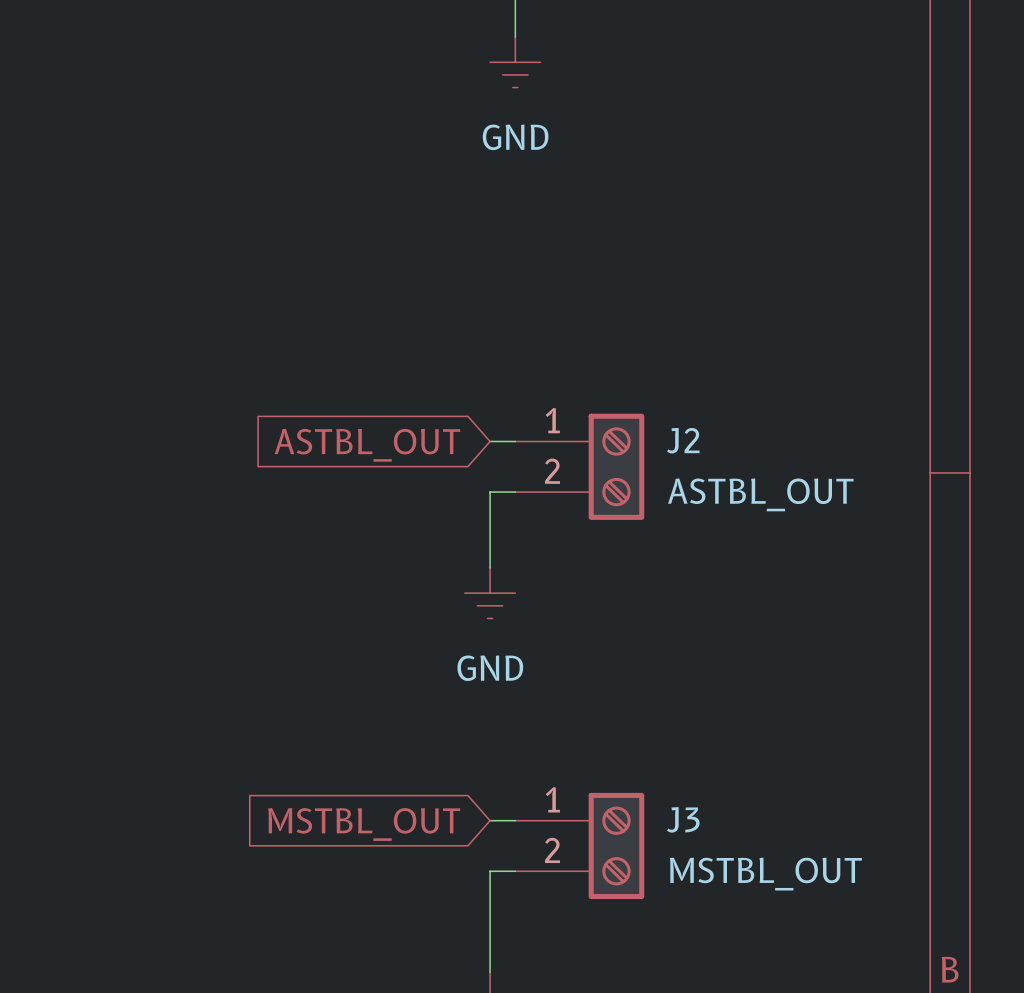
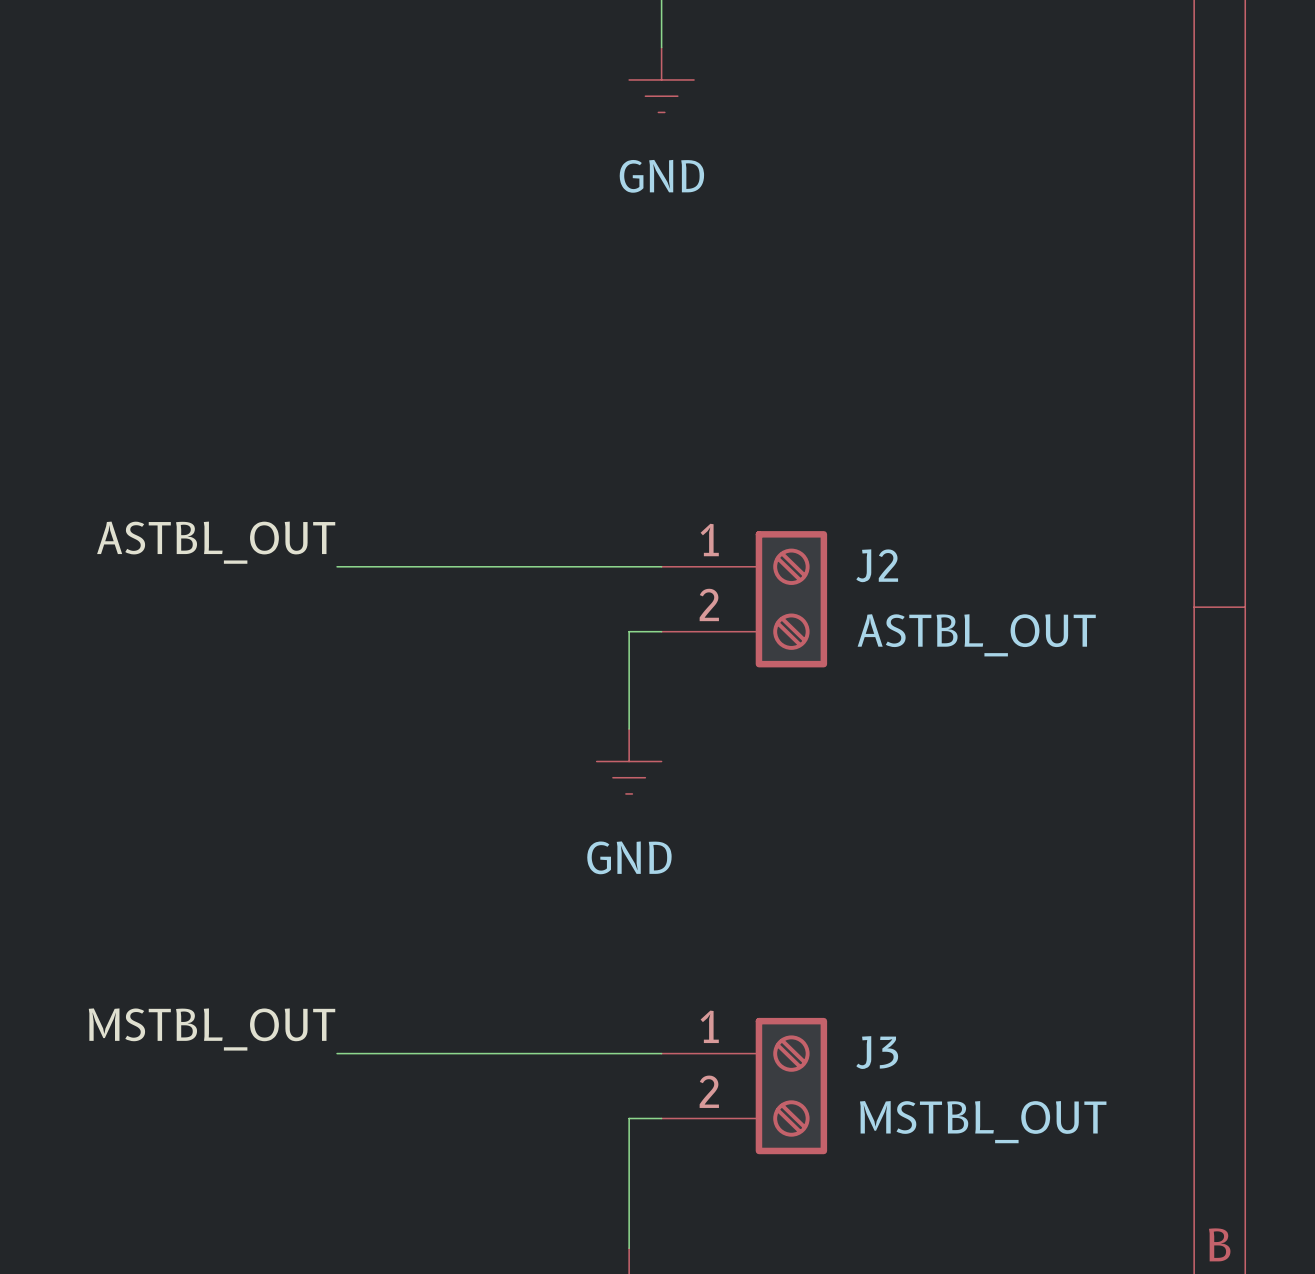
label: none -> ASTBL_OUT (216, 542)
wire: none -> (337, 566) (629, 566)
global label: ASTBL_OUT (367, 445) -> none
label: none -> MSTBL_OUT (212, 1029)
wire: none -> (337, 1053) (629, 1053)
global label: MSTBL_OUT (364, 824) -> none

